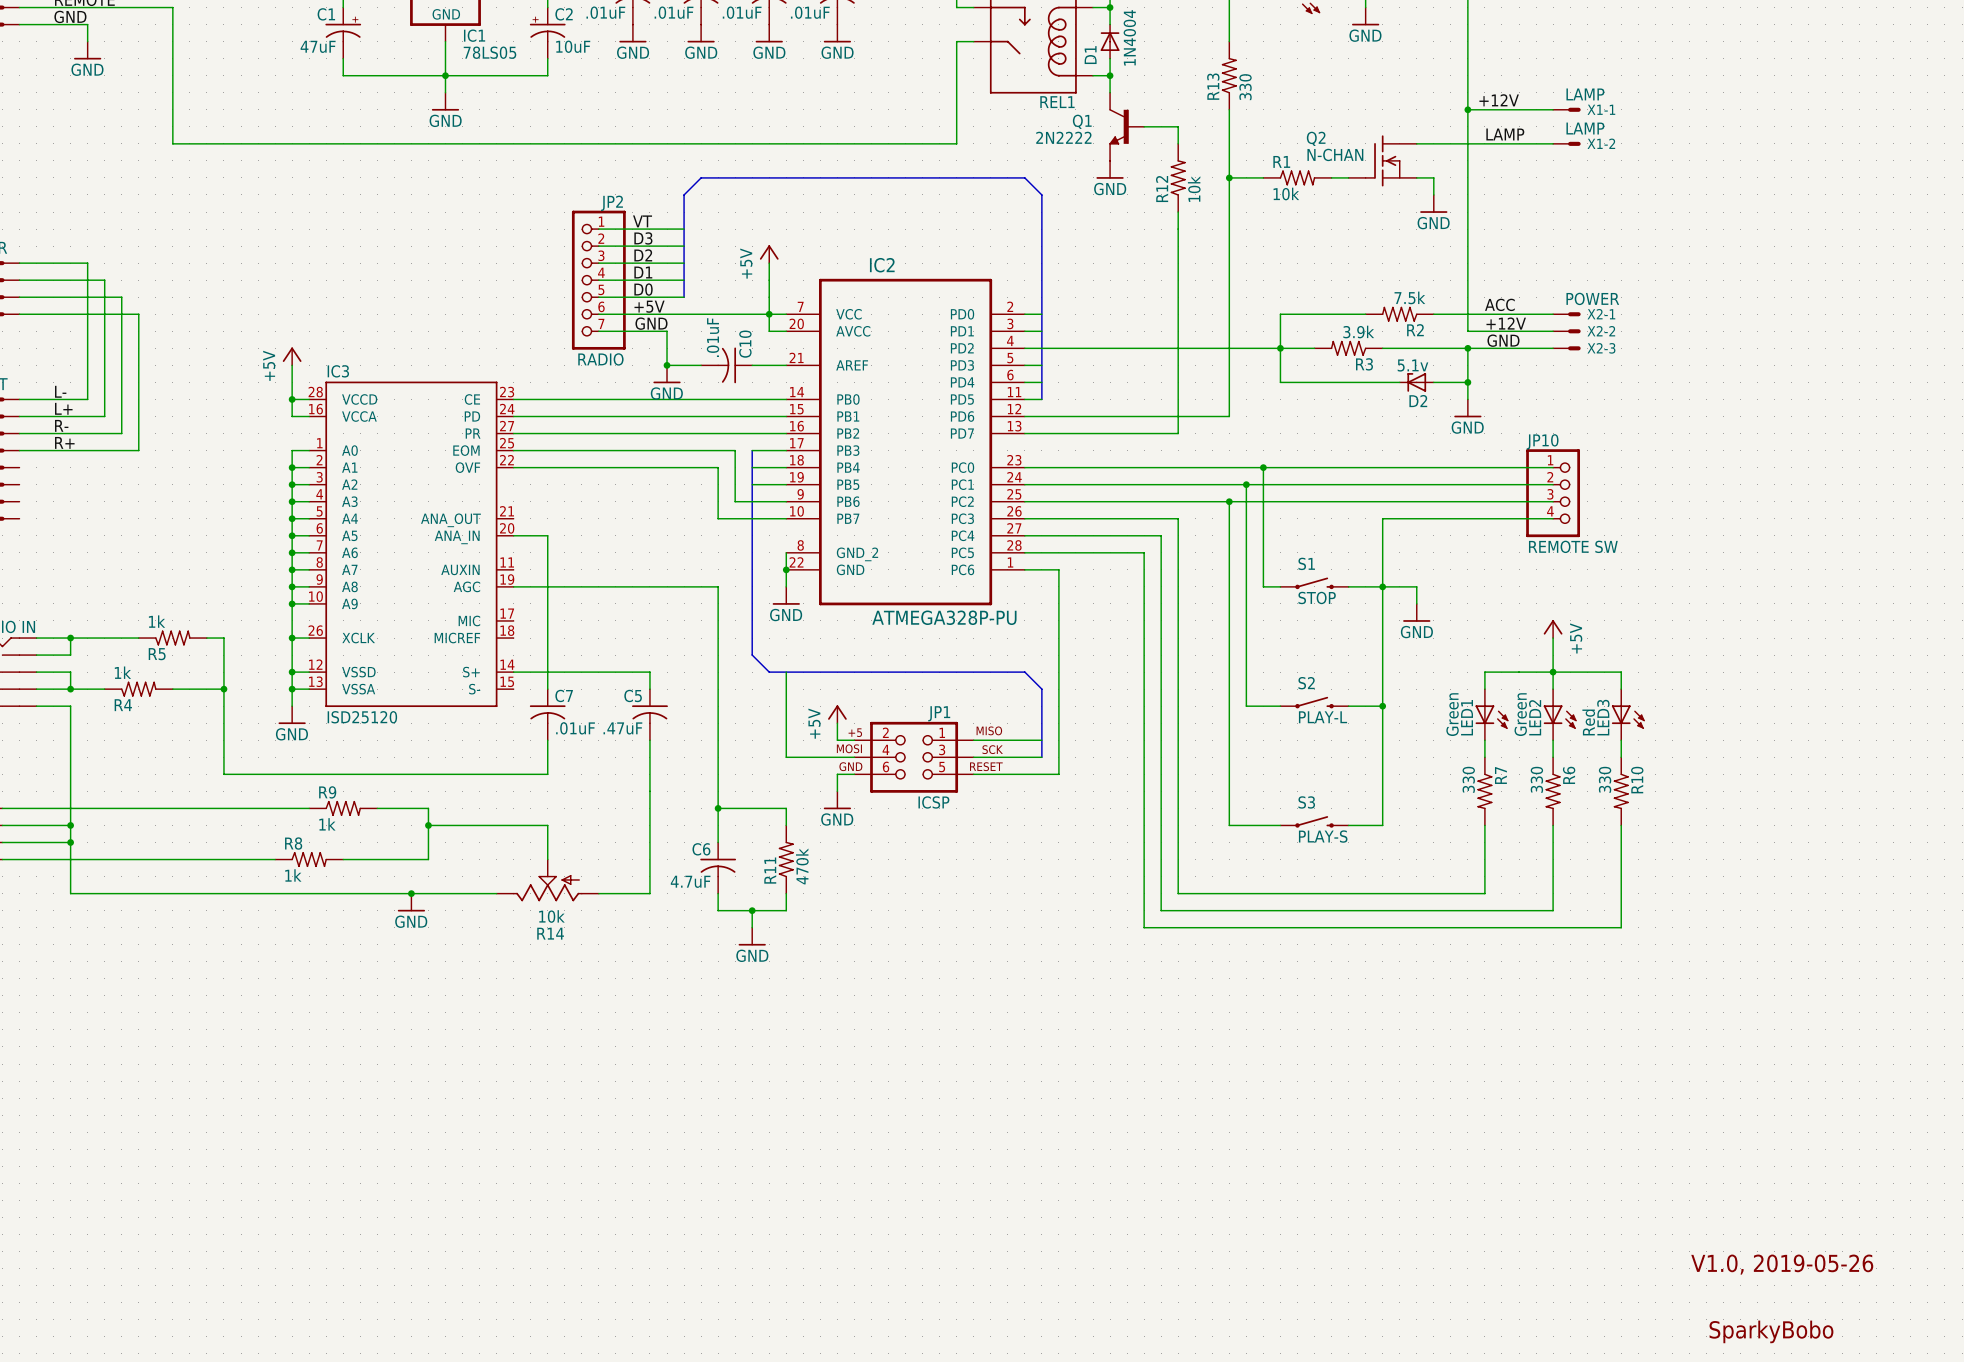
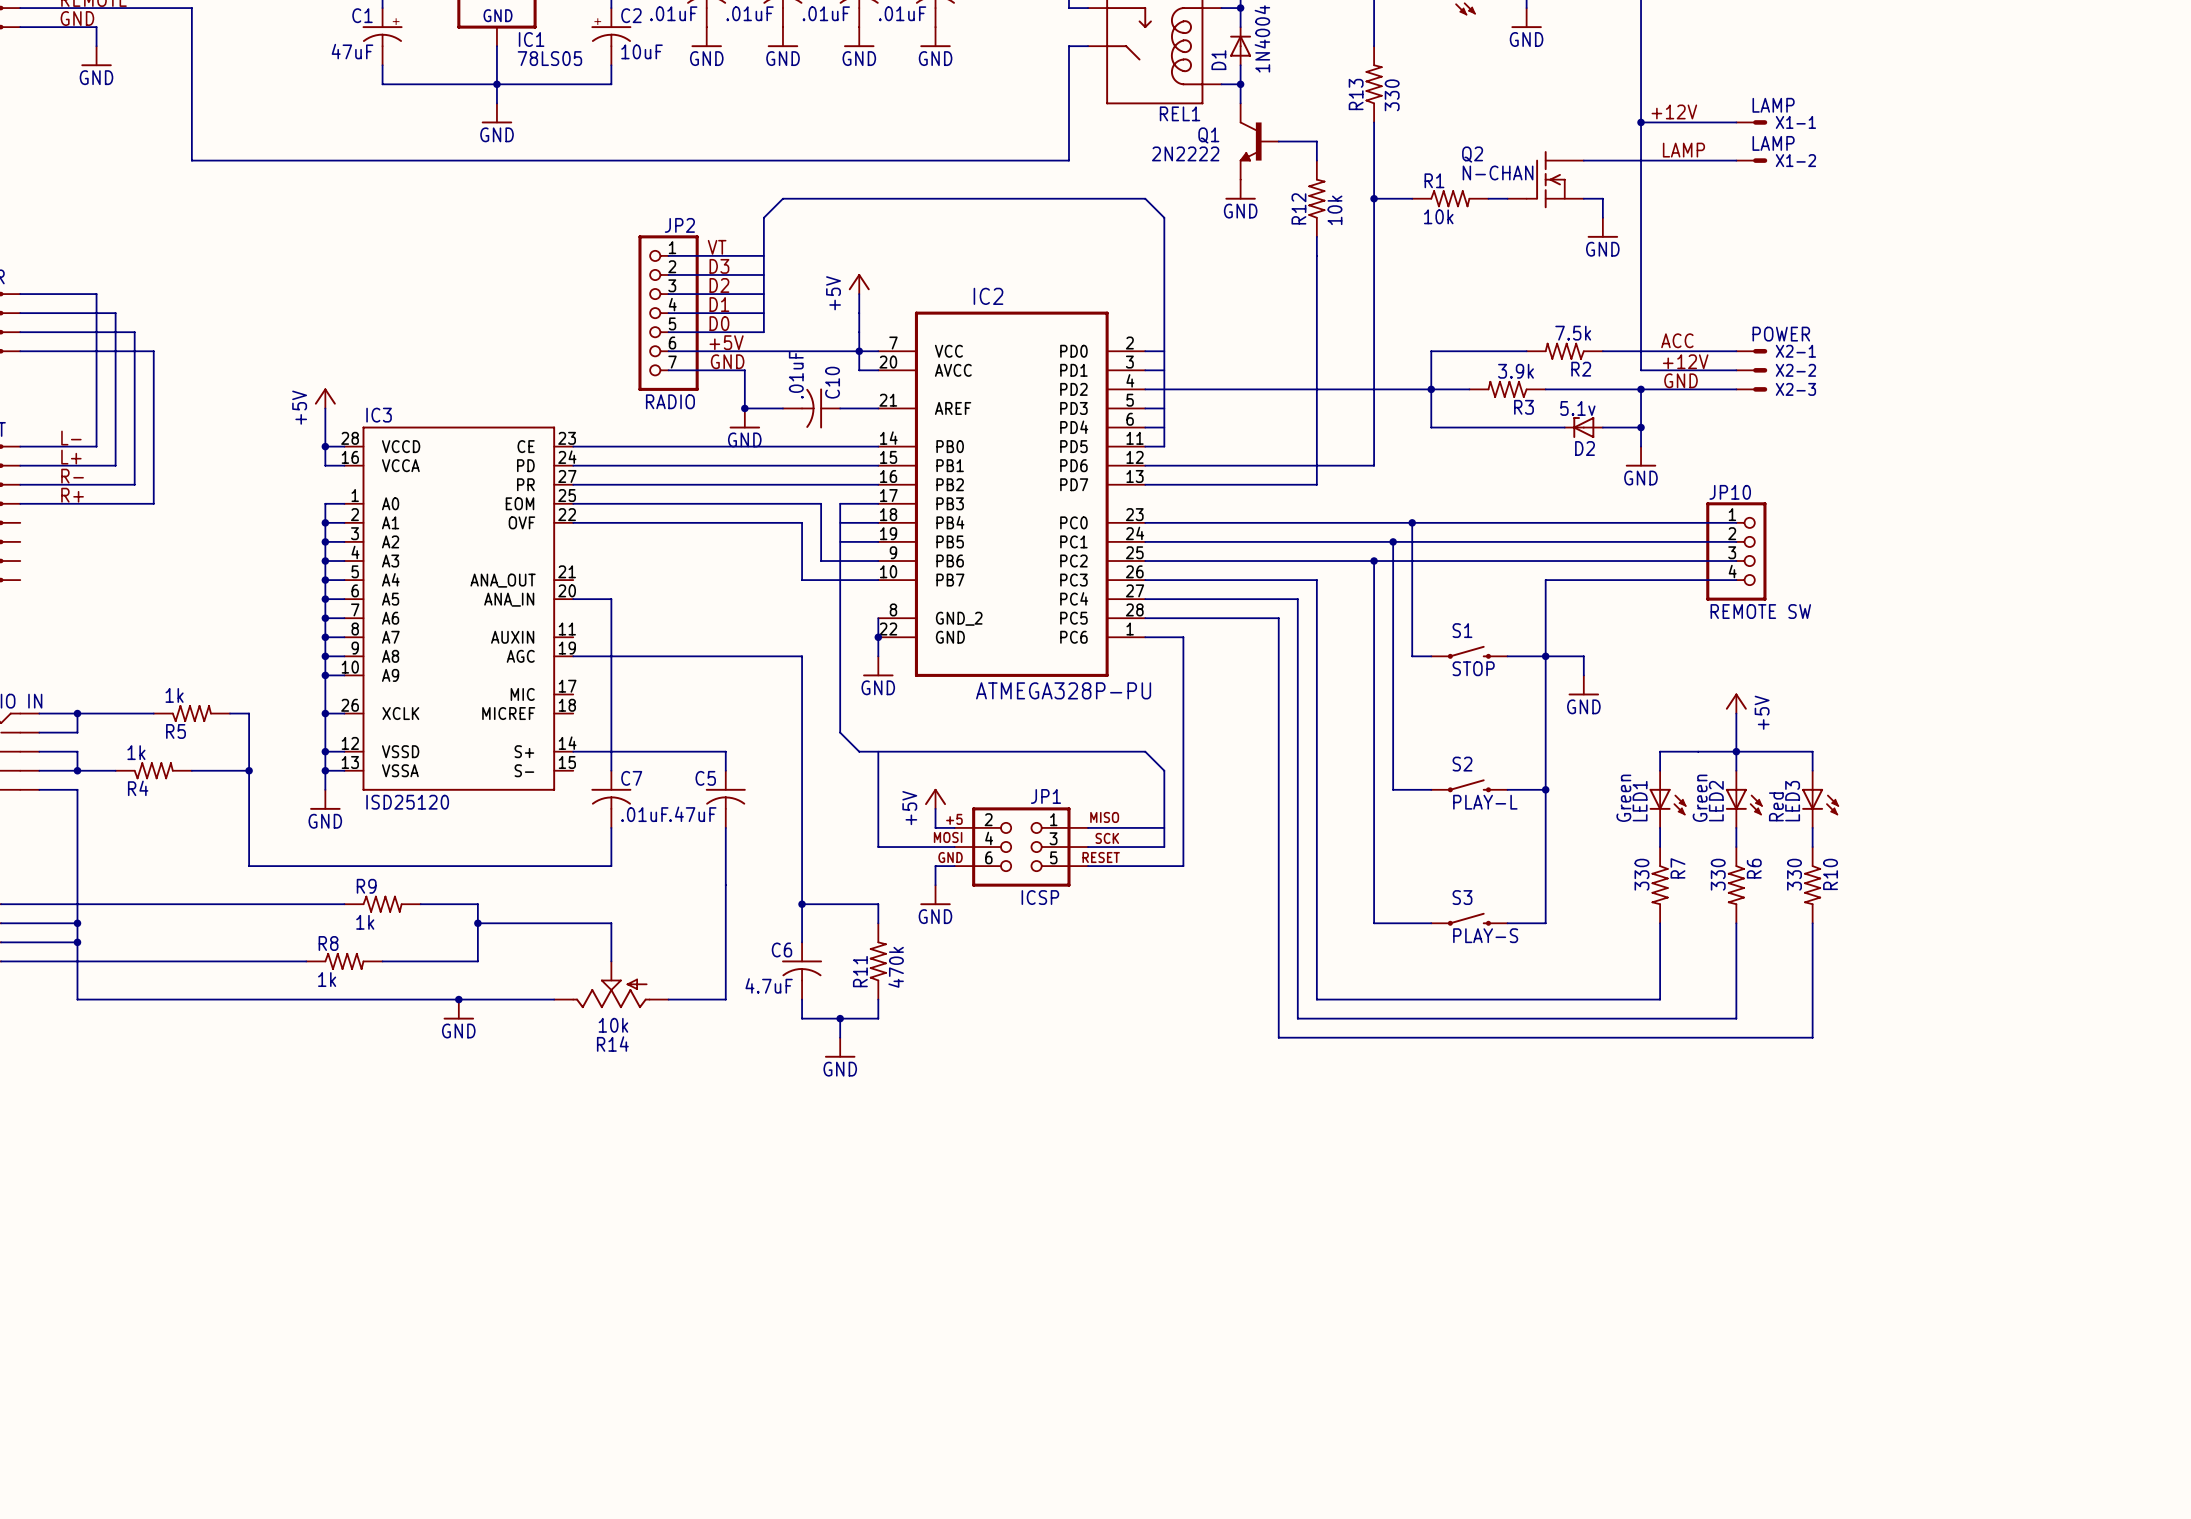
text: V1.0, 2019-05-26 (1782, 1264) -> none
text: SparkyBobo (1771, 1331) -> none

